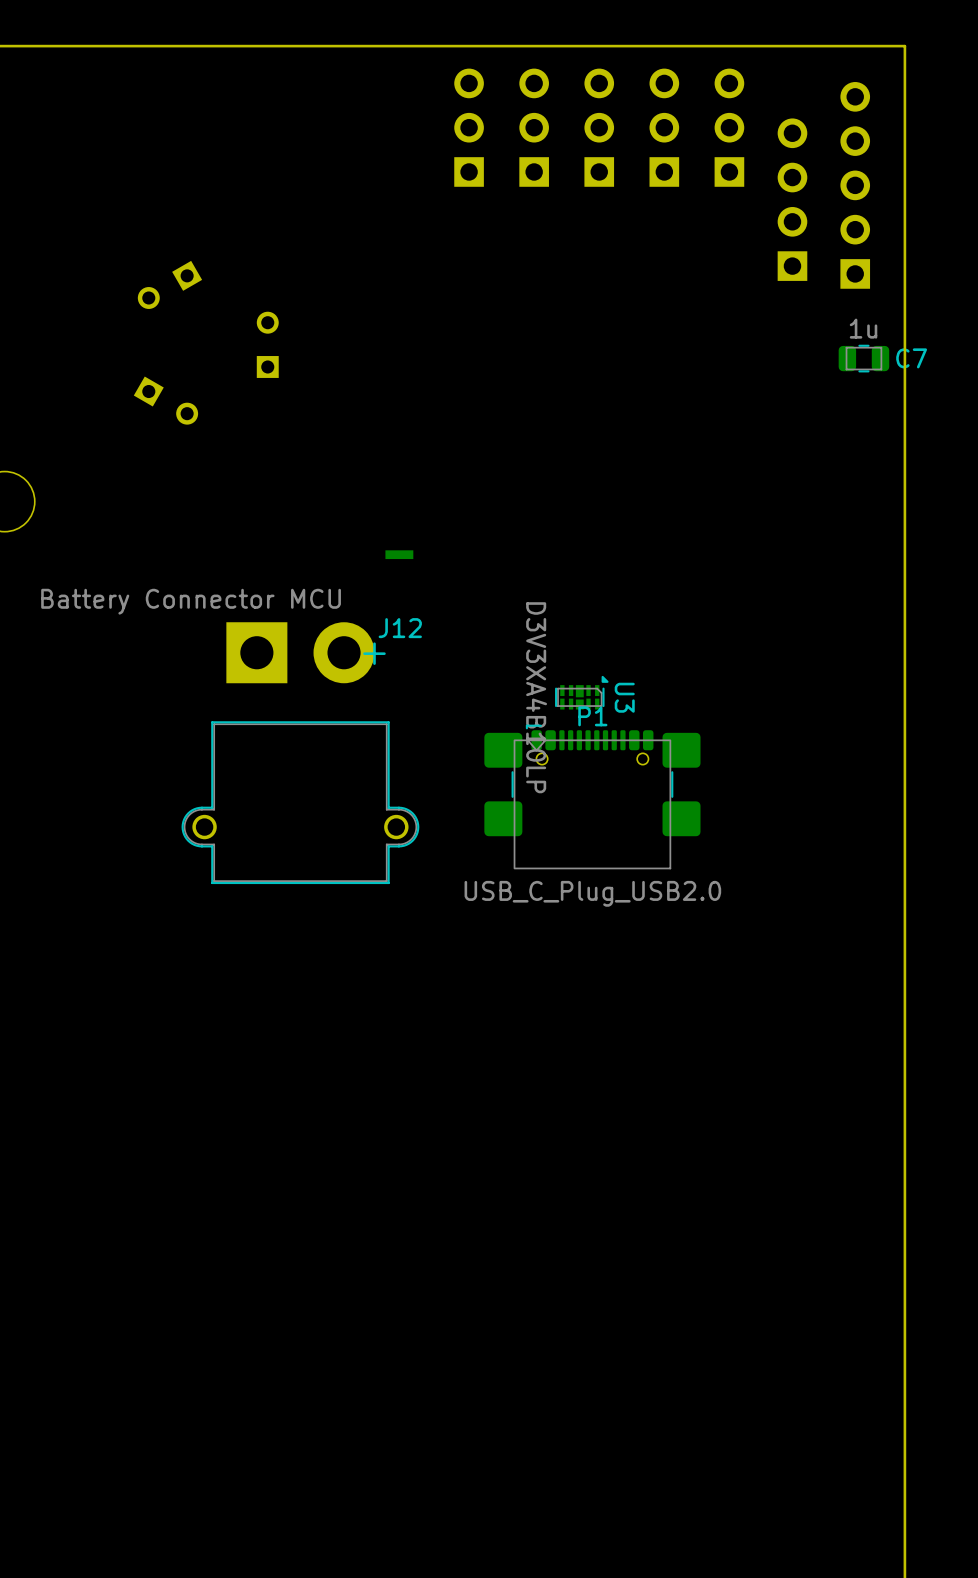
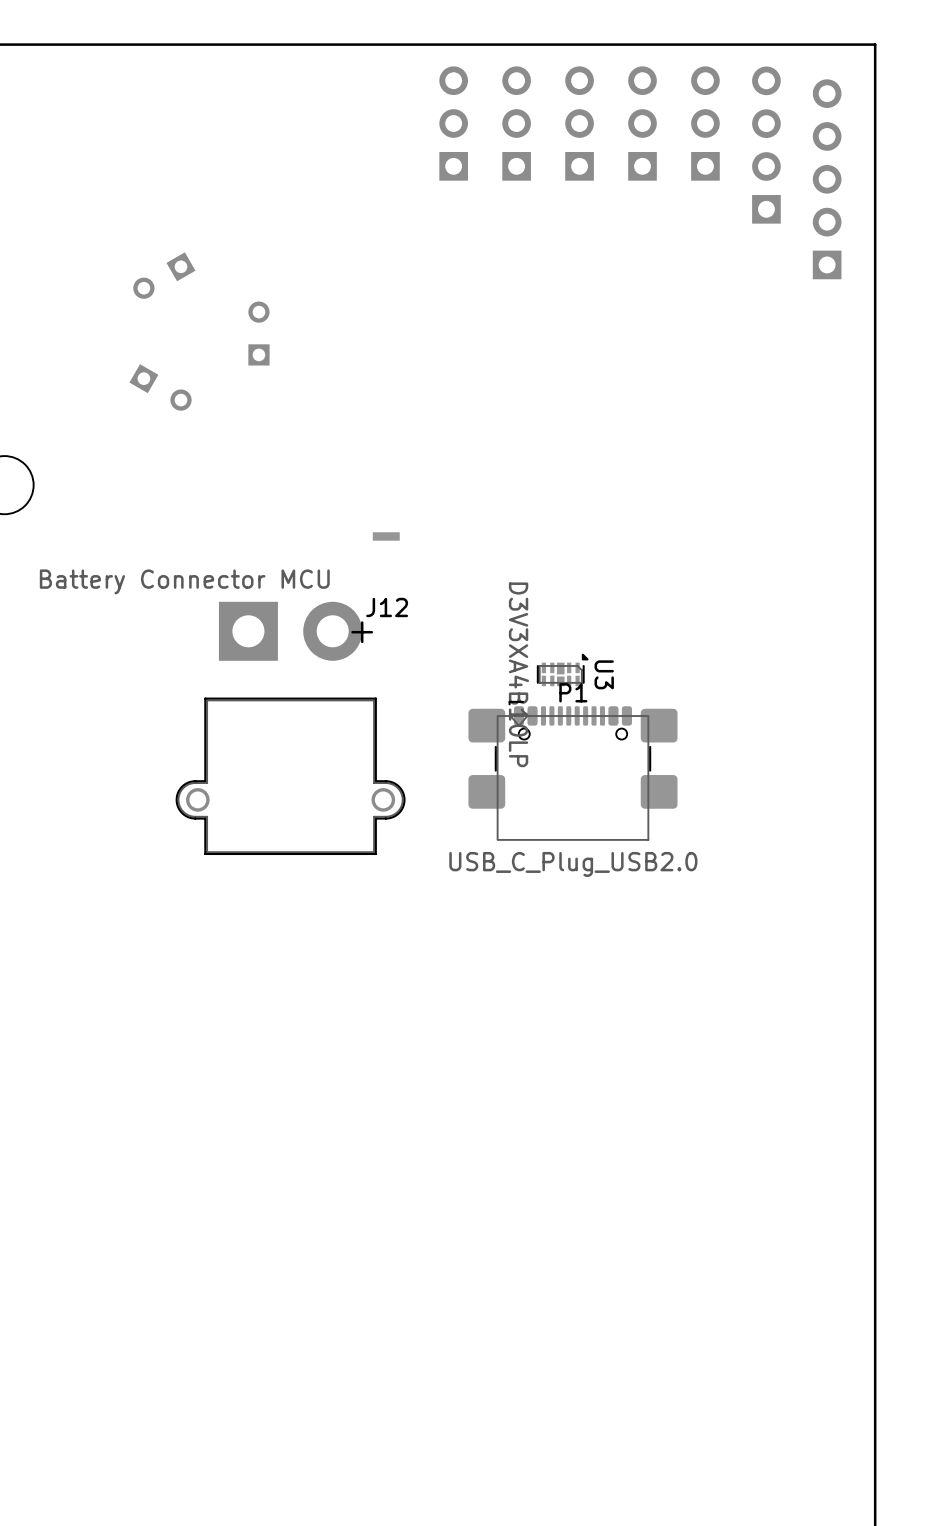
part position: (792, 199) -> (766, 145)
C7: 1u (863, 358) -> none

